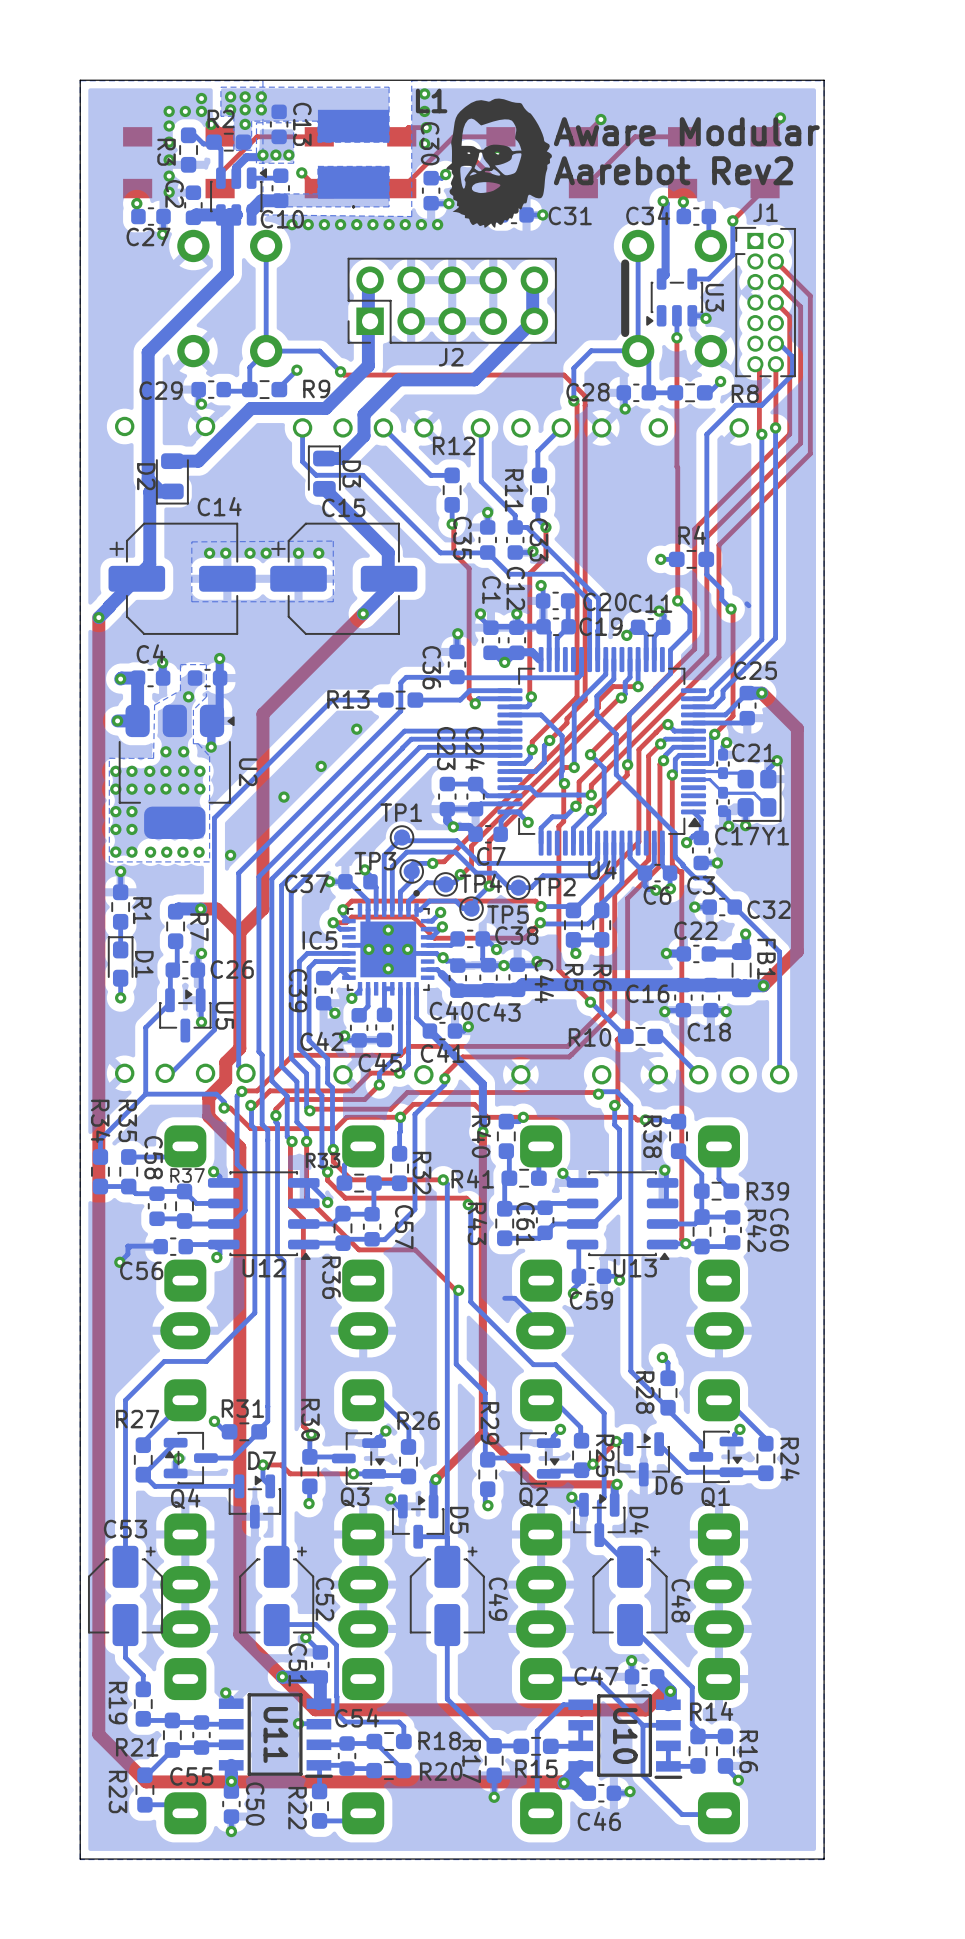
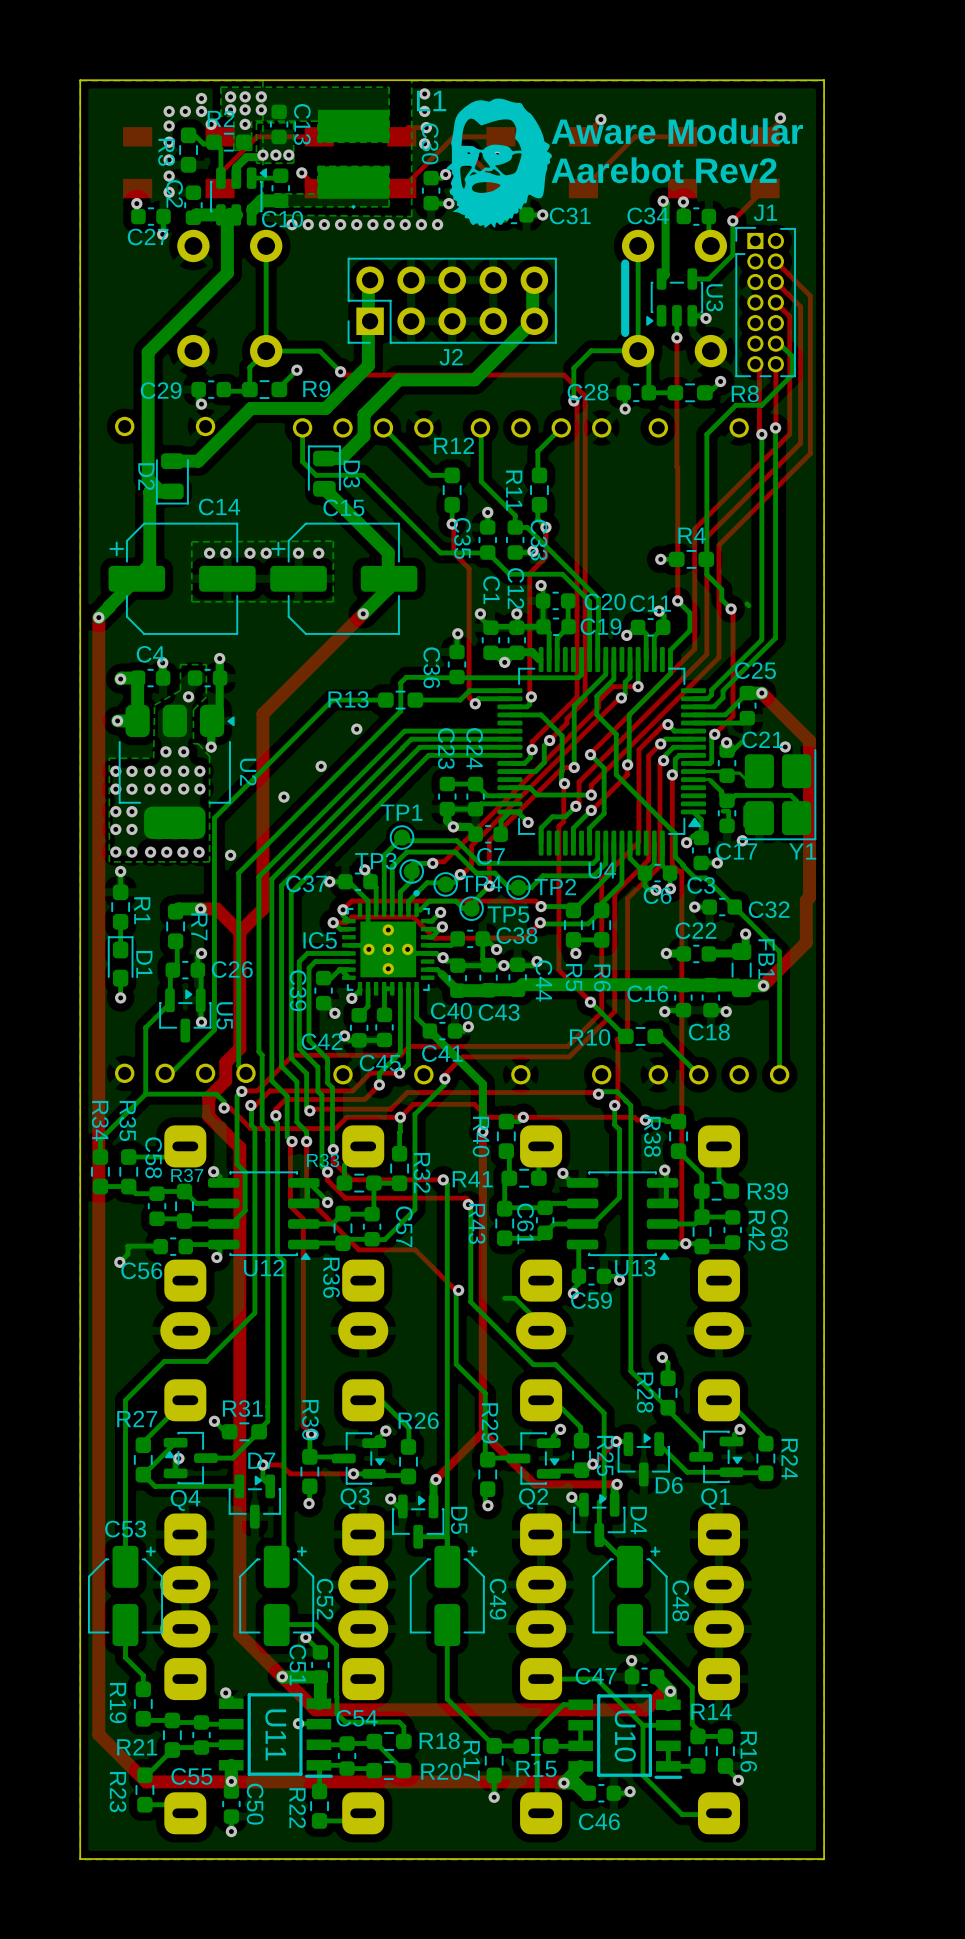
top track: (797, 728) (797, 951) -> (797, 728) (809, 740) (809, 897) (806, 900) (806, 942) (797, 951)
bottom track: none -> (741, 742) (733, 750) (728, 750)
C21 footprint: [716, 748, 730, 780] -> [717, 743, 737, 783]
C21 name position: C21 (753, 752) -> C21 (762, 739)
bottom track: (777, 760) (768, 769) -> none
via position: (777, 760) -> (785, 746)
Y1 footprint: [732, 764, 782, 822] -> [739, 749, 817, 841]
bottom track: none -> (710, 780) (728, 802) (735, 795) (790, 795) (796, 801) (796, 818)
C17 footprint: [716, 786, 730, 818] -> [717, 793, 737, 834]
bottom track: (723, 792) (754, 793) (768, 807) -> none
via: (745, 825) -> none
via: (728, 826) -> none
C17 name position: C17 (737, 836) -> C17 (736, 851)
via: none -> (742, 840)

